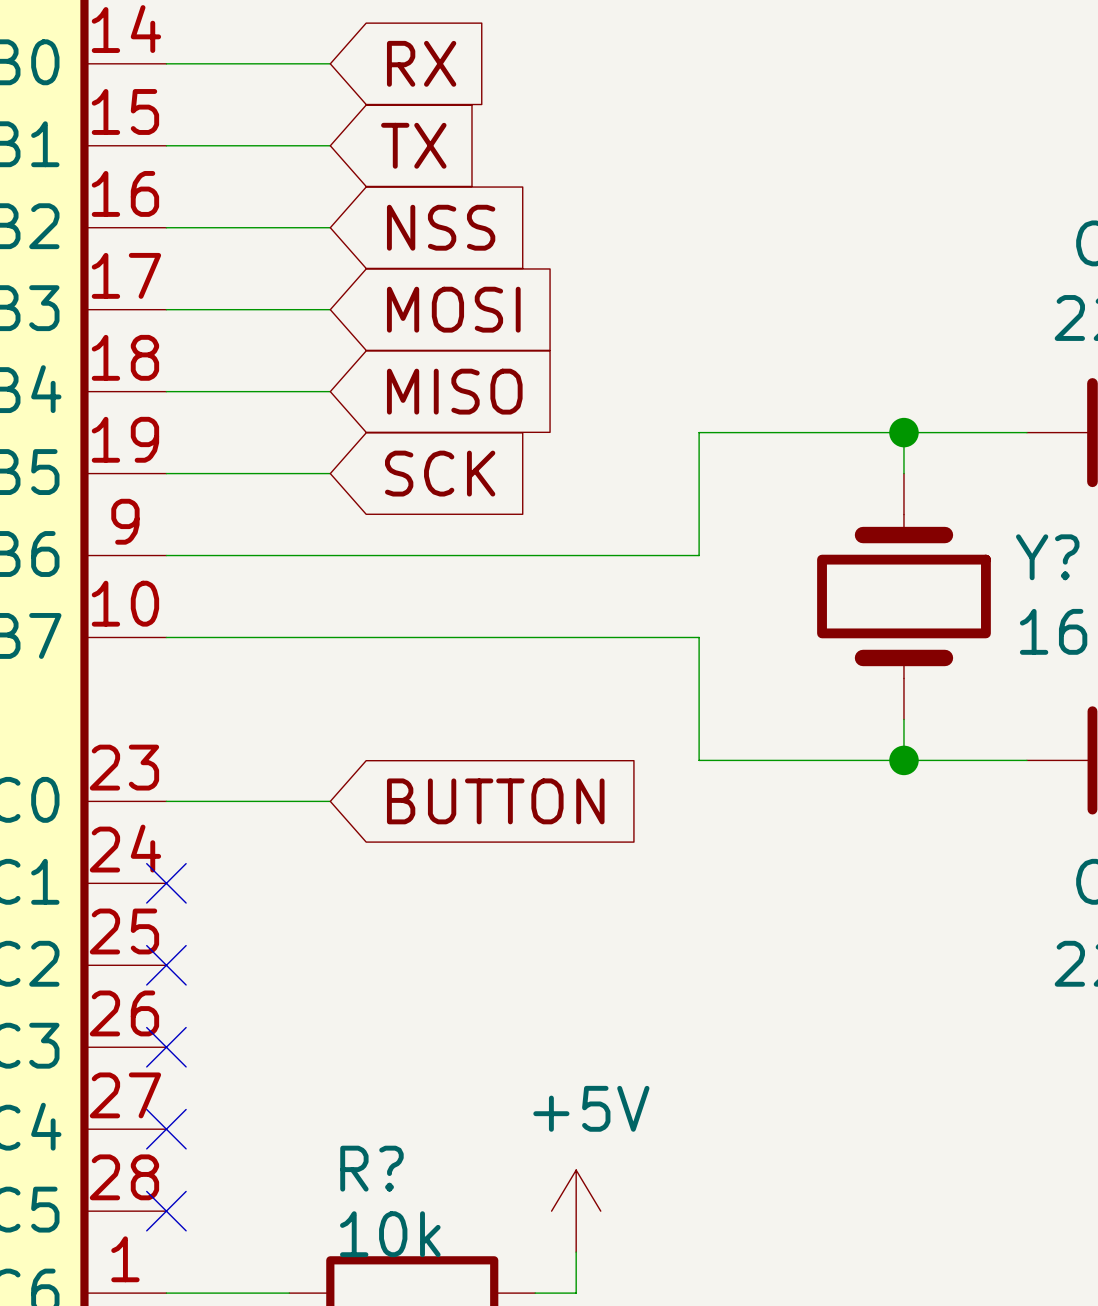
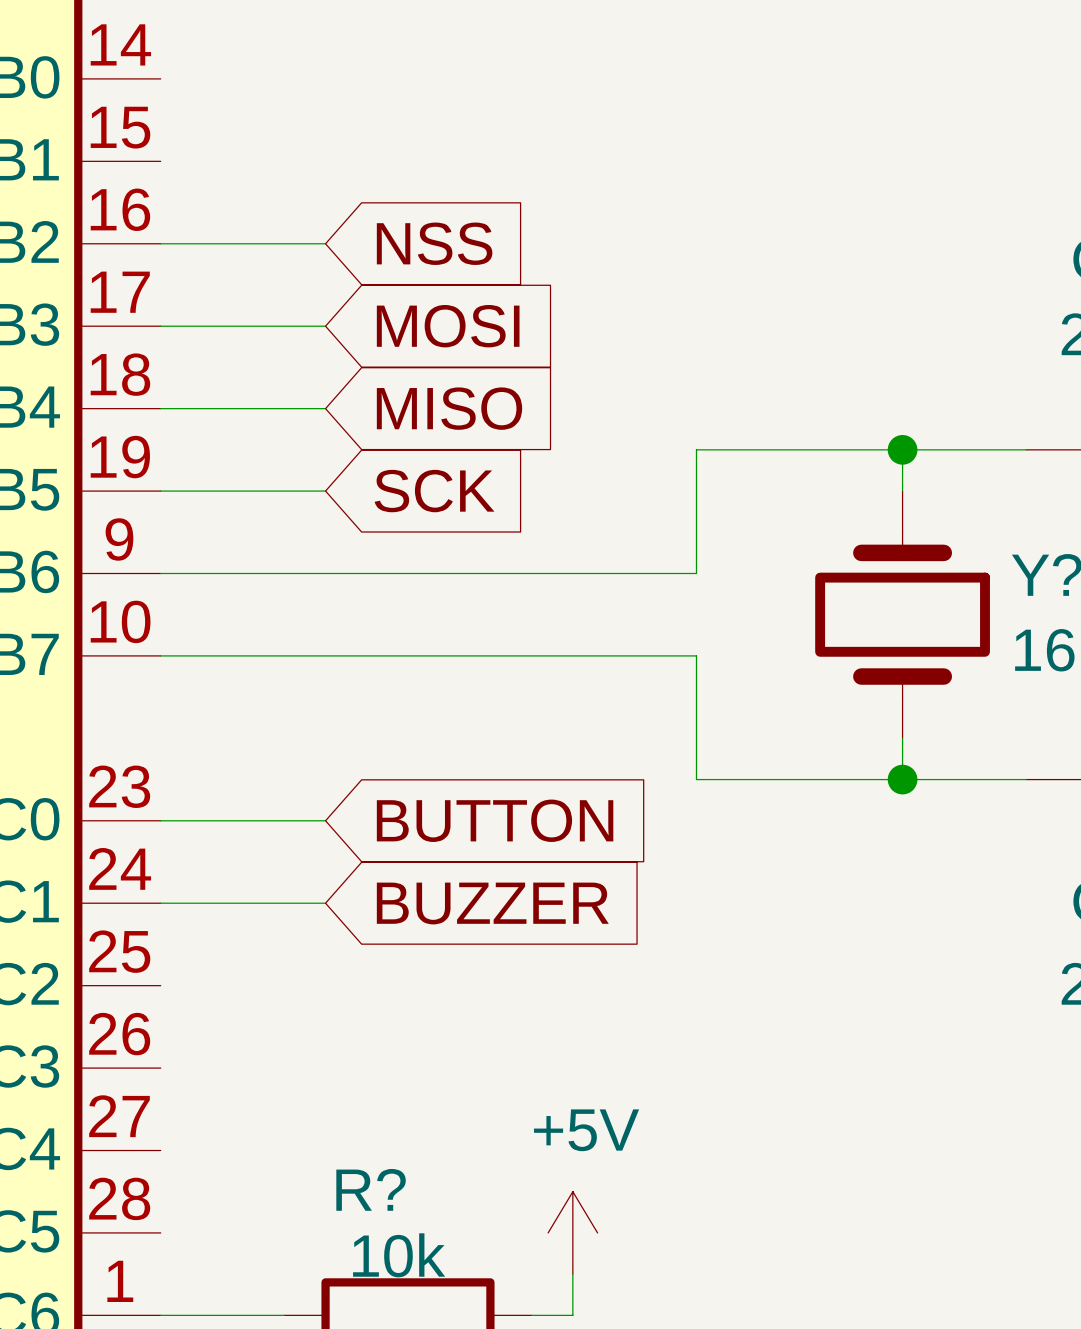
wire: (166, 63) (330, 63) -> none
global label: RX (421, 63) -> none
wire: (166, 145) (330, 145) -> (160, 903) (325, 903)
global label: TX (413, 145) -> none
no-connect mark: (166, 883) -> none
global label: none -> BUZZER (492, 903)
no-connect mark: (166, 965) -> none
no-connect mark: (166, 1047) -> none
no-connect mark: (166, 1129) -> none
no-connect mark: (166, 1211) -> none

